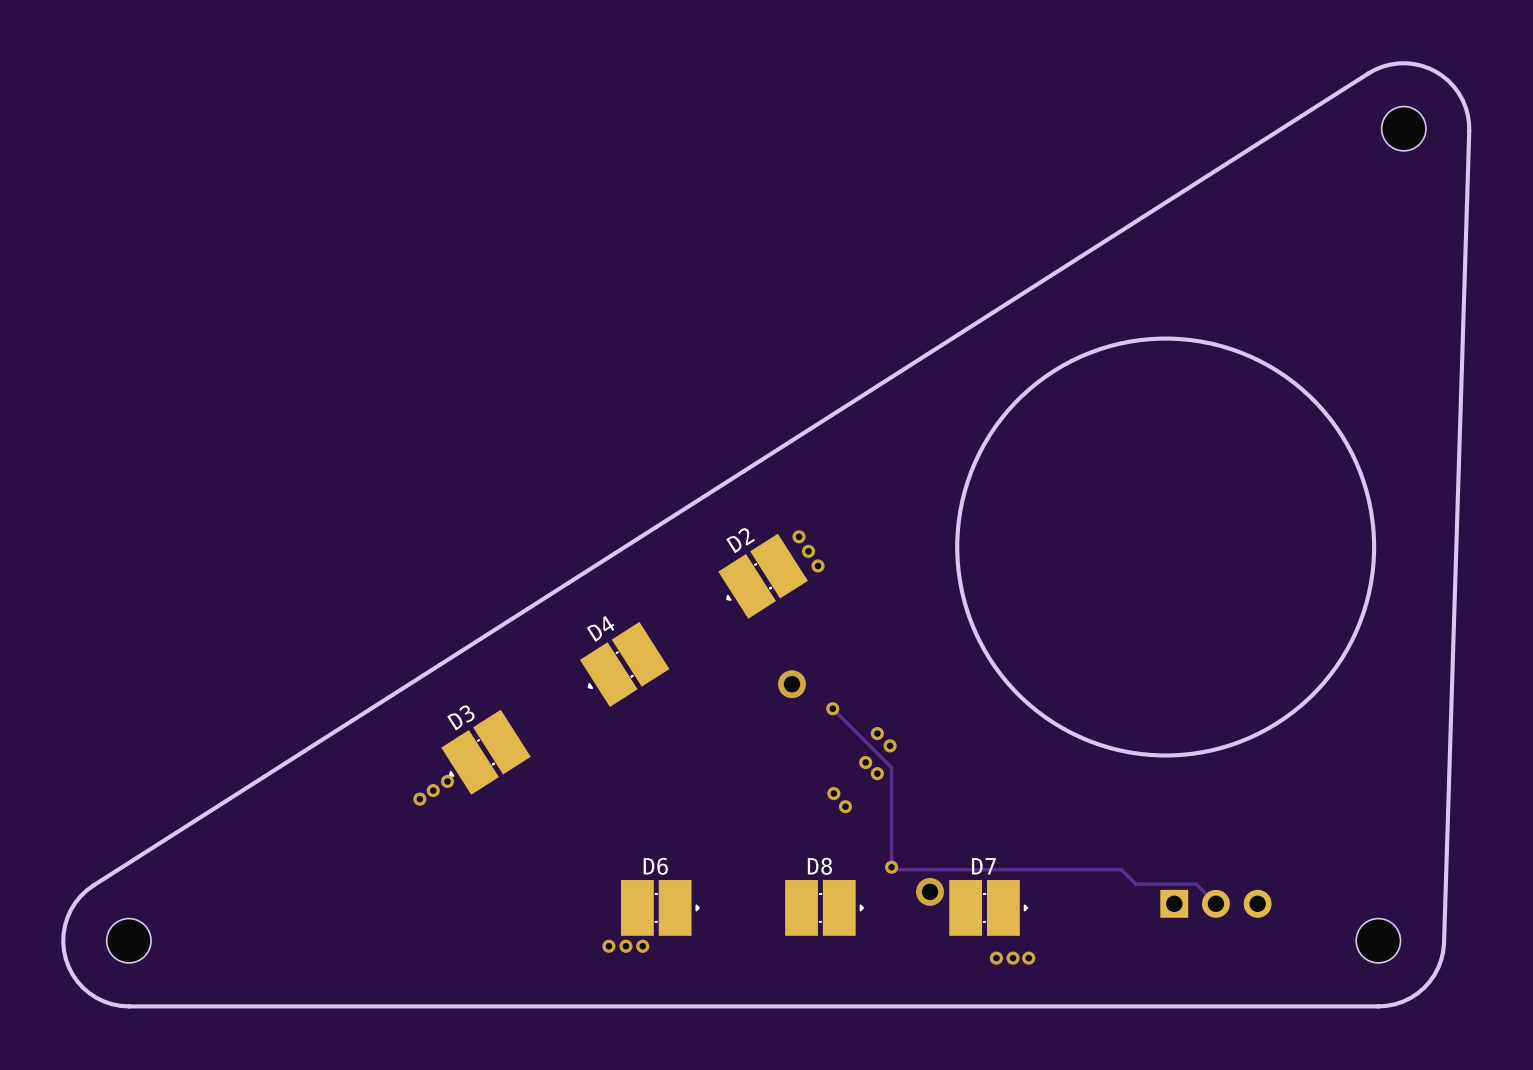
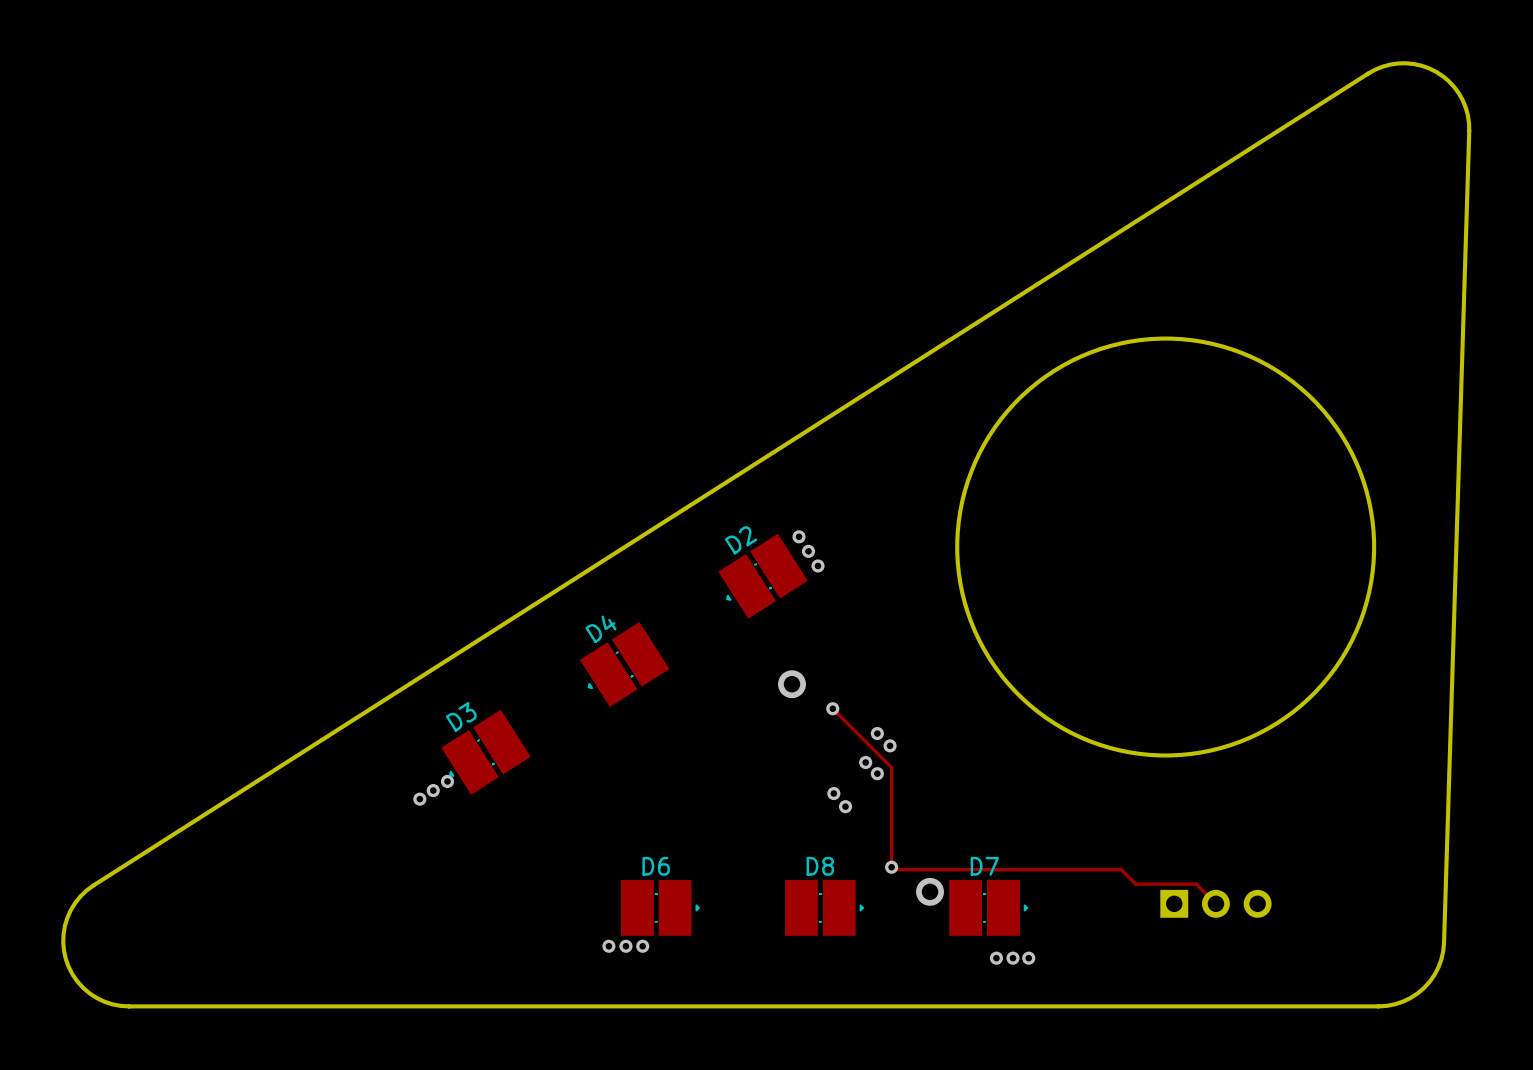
part: (1403, 128) -> none
part: (128, 940) -> none
part: (1378, 940) -> none

